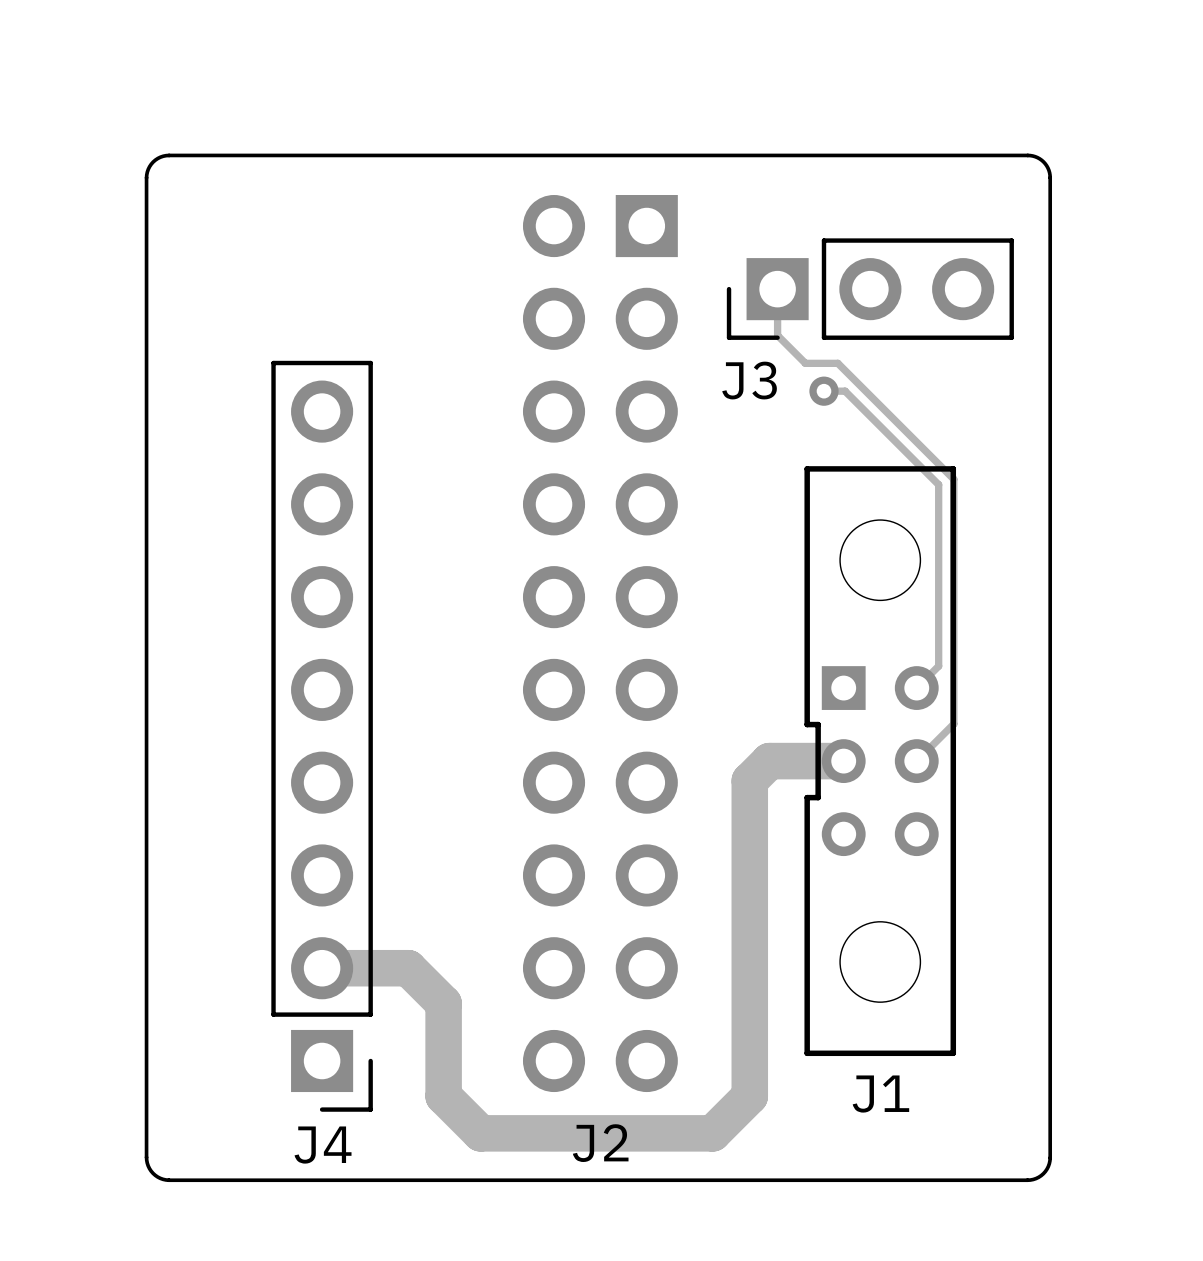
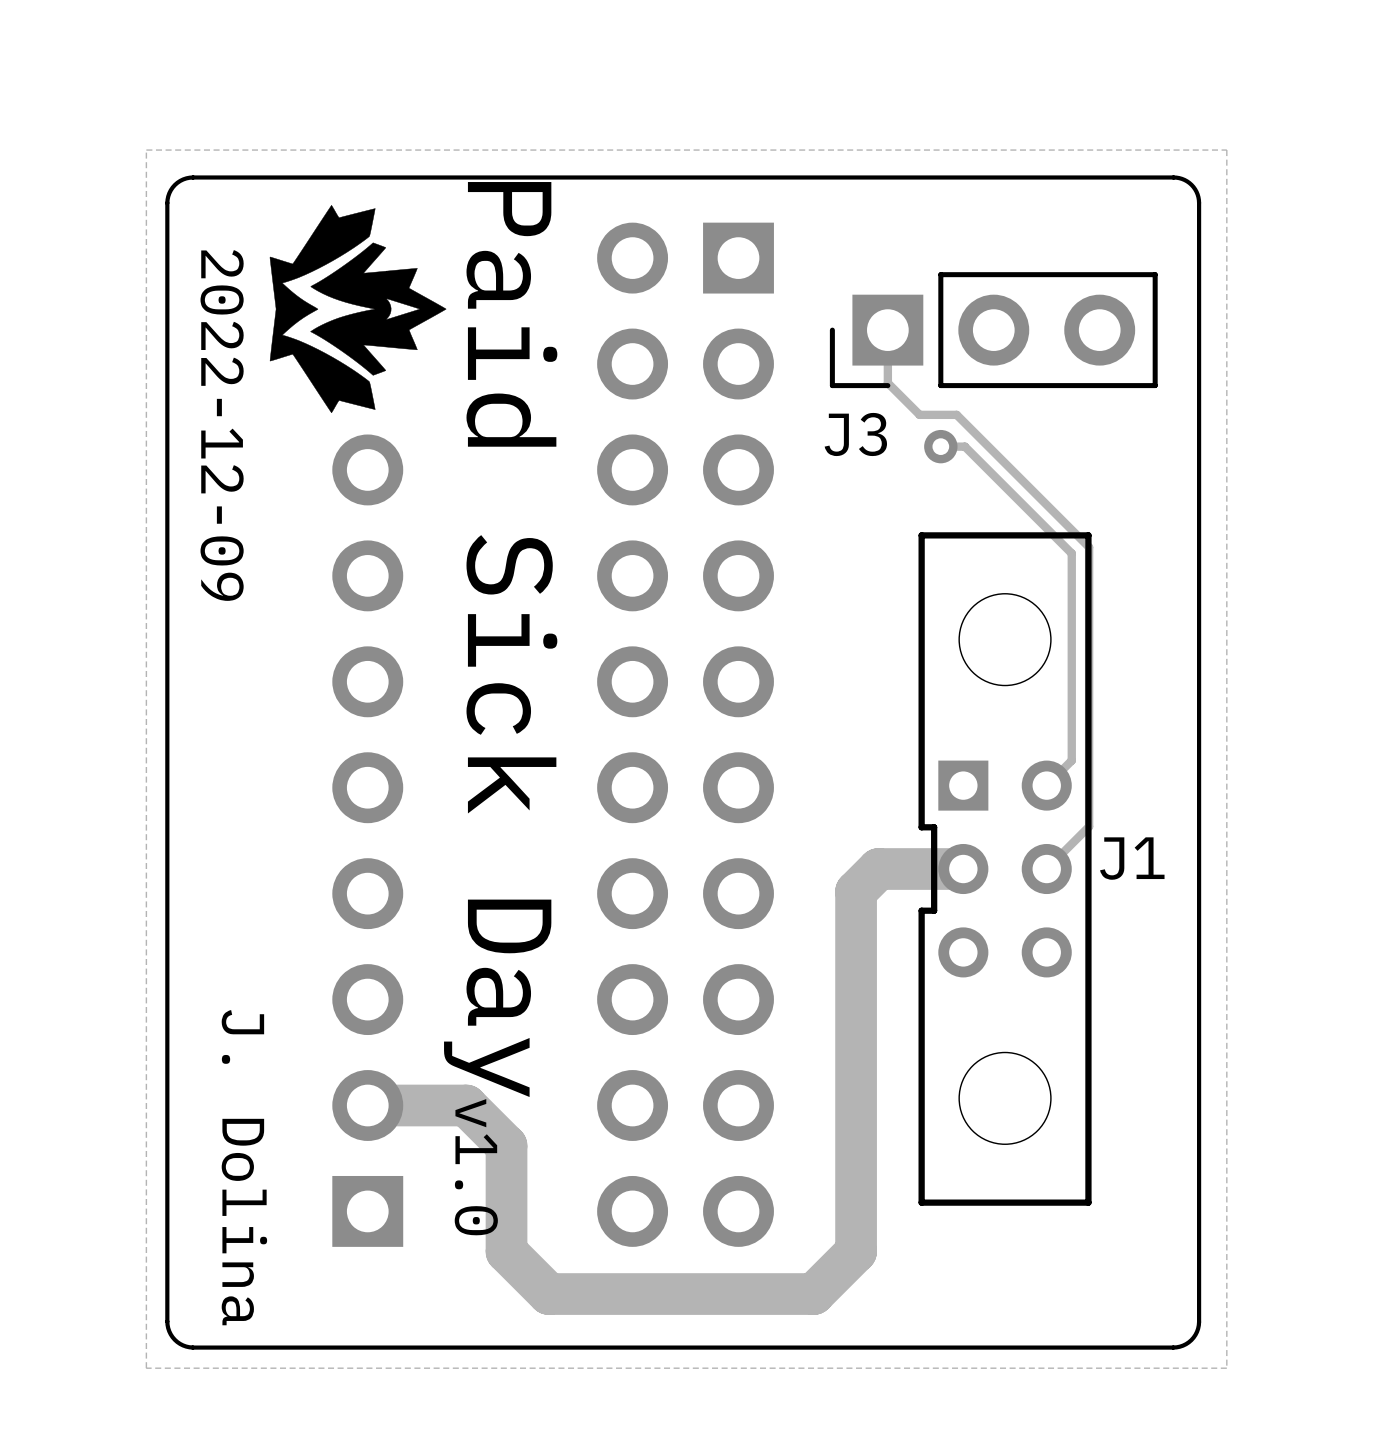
zone outline: none -> (146, 150) (146, 1368) (1226, 1368) (1226, 150) (146, 150)
drawing: none -> [269, 205, 447, 414]
text: none -> 2022-12-09 (222, 425)
text: none -> Paid Sick Day (500, 639)
J4 side: top (322, 736) -> bottom (367, 840)
text: none -> J. Dolina (244, 1167)
text: none -> v1.0 (476, 1167)
J1 name position: J1 (880, 1094) -> J1 (1132, 858)
J2 name: J2 (600, 1143) -> none

